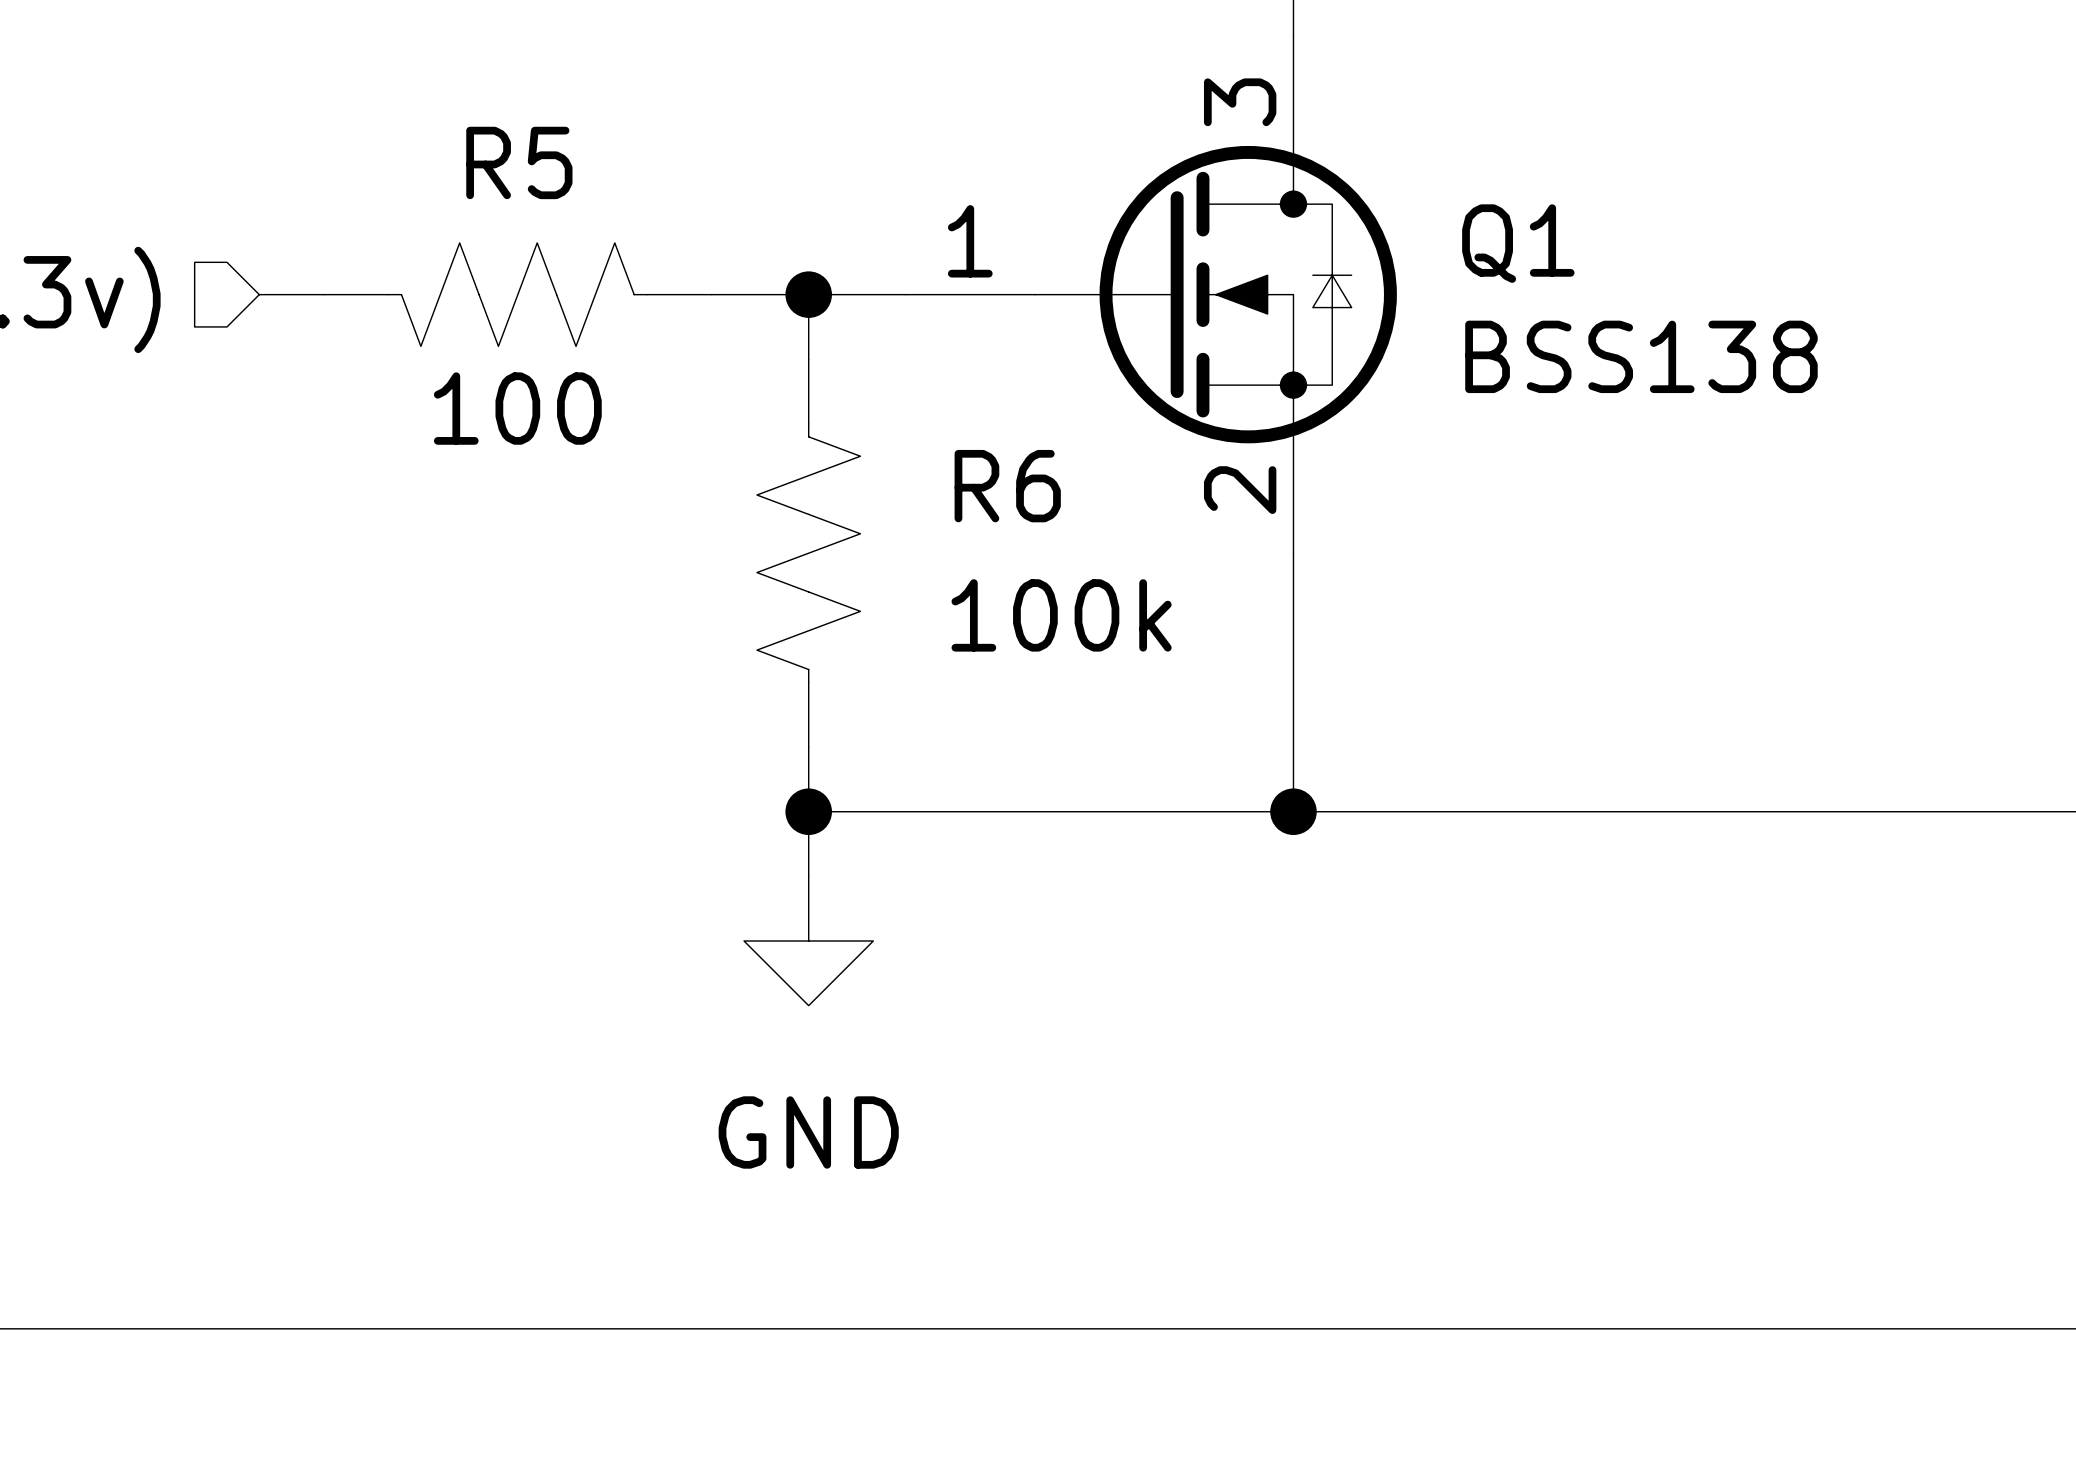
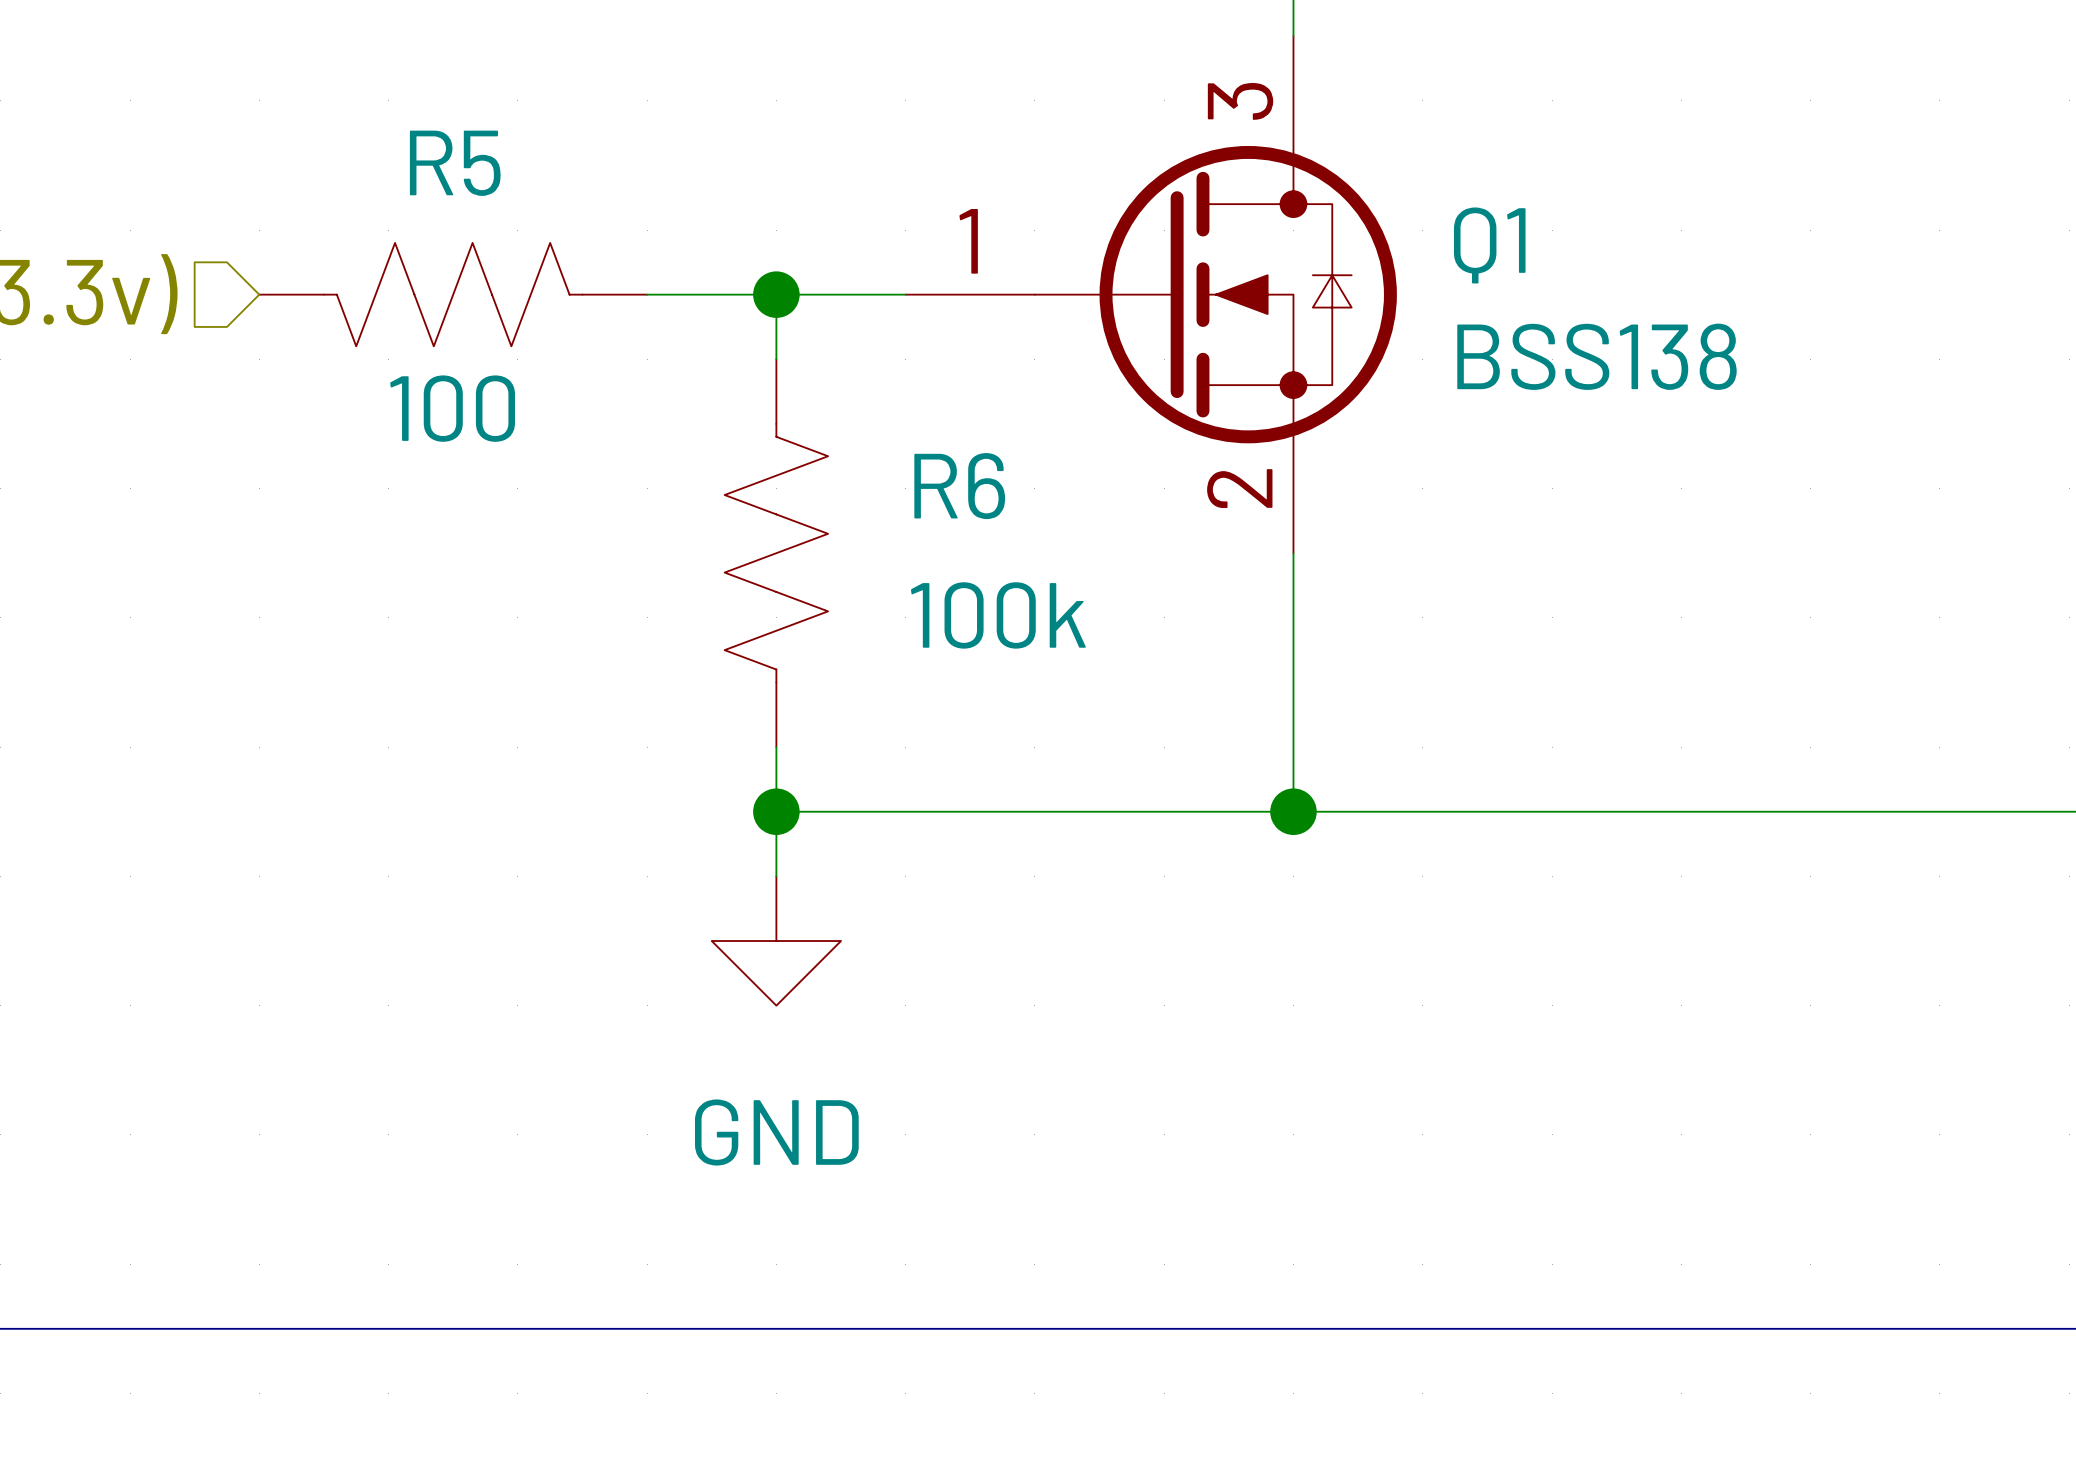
R5 position: (517, 294) -> (453, 294)
wire: (808, 294) (808, 359) -> (776, 294) (776, 359)
junction position: (808, 294) -> (776, 294)
R6 position: (808, 553) -> (776, 553)
wire: (808, 747) (808, 876) -> (776, 747) (776, 876)
junction position: (808, 811) -> (776, 811)
power symbol position: GND (808, 941) -> GND (776, 941)

